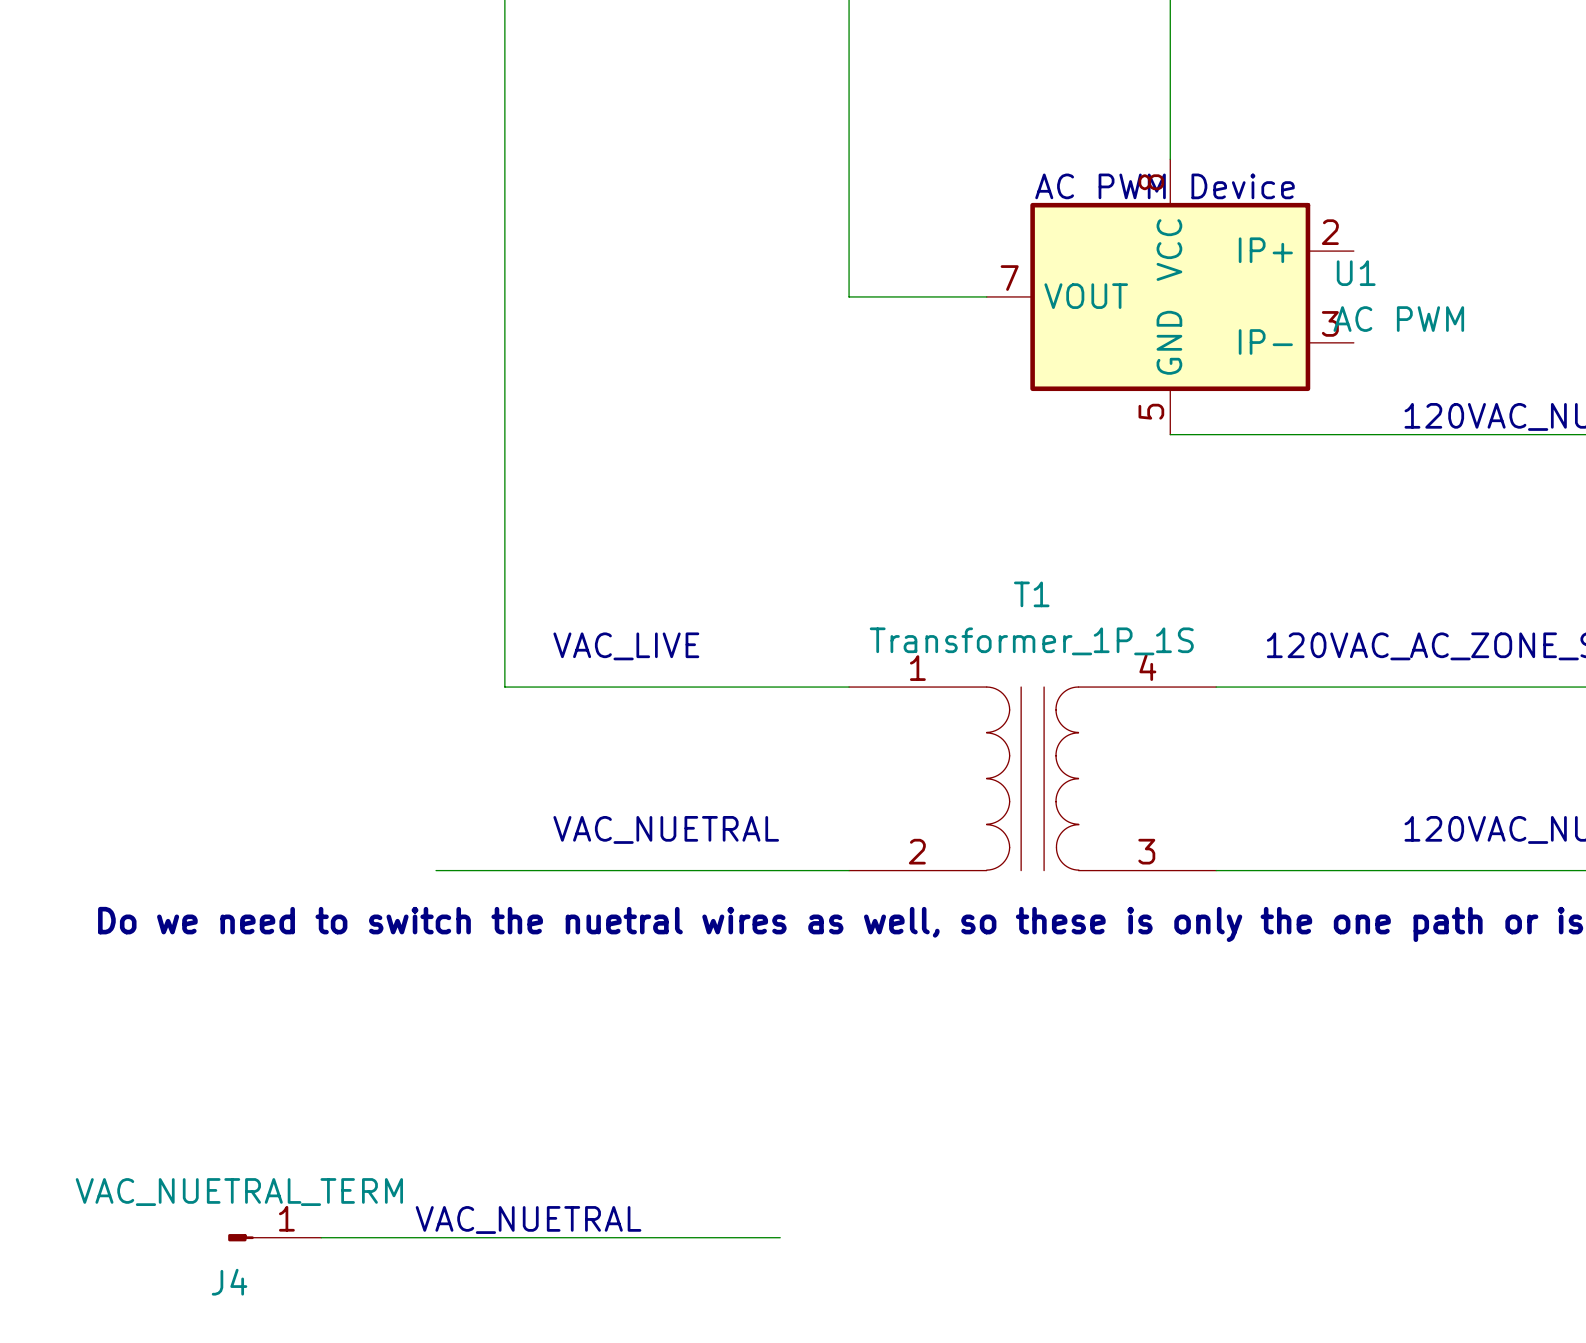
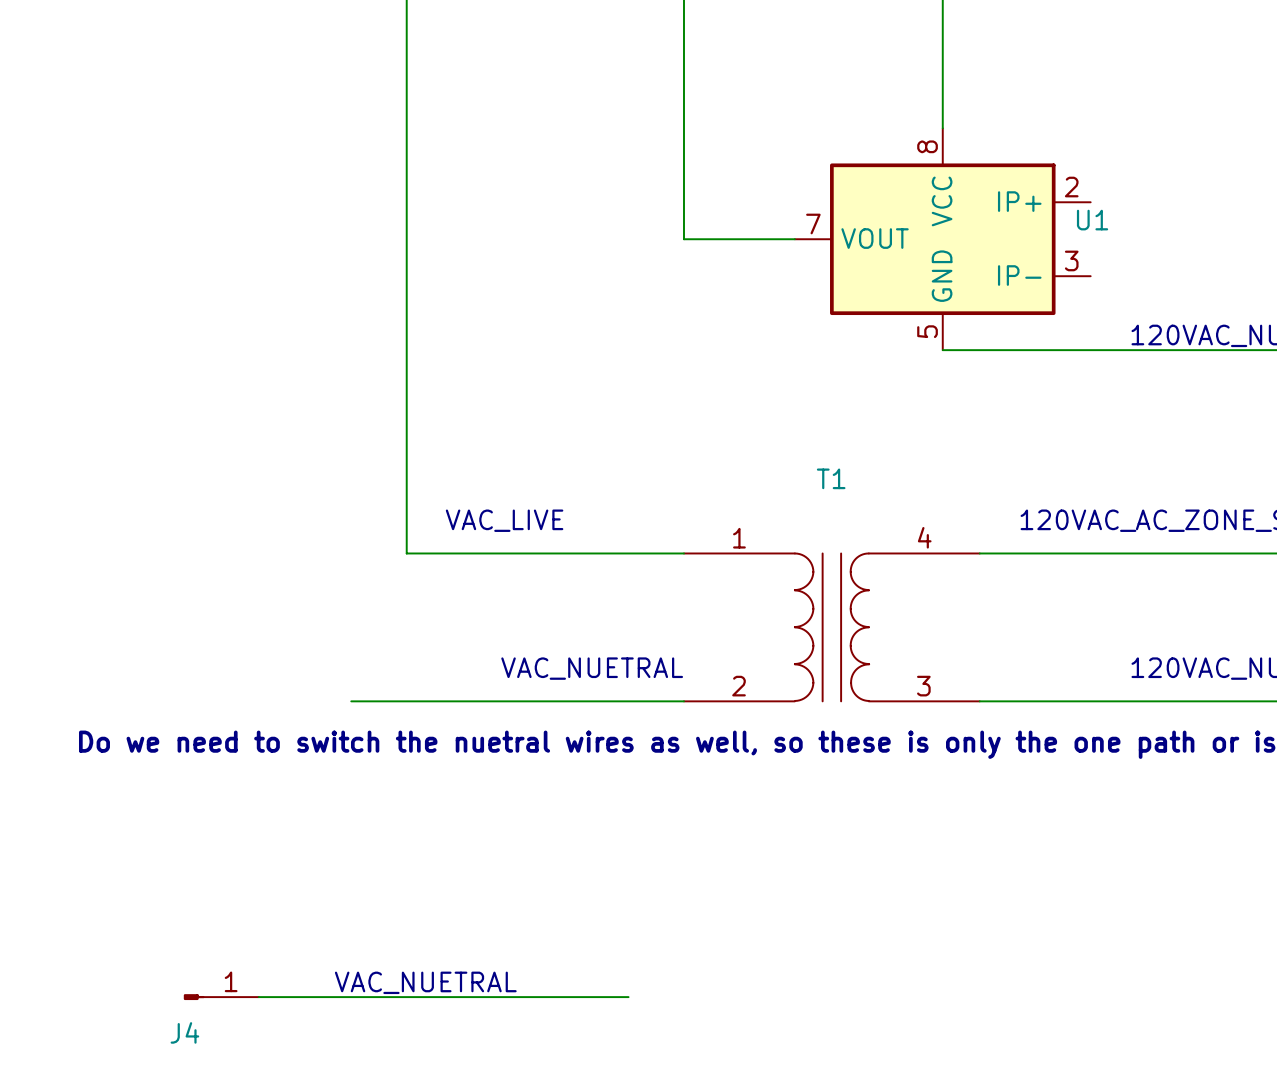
text: AC PWM Device (1164, 186) -> none
U1 value: AC PWM (1398, 319) -> none
T1 value: Transformer_1P_1S (1031, 641) -> none
text position: VAC_NUETRAL (666, 829) -> VAC_NUETRAL (592, 668)
J4 value: VAC_NUETRAL_TERM (239, 1192) -> none

